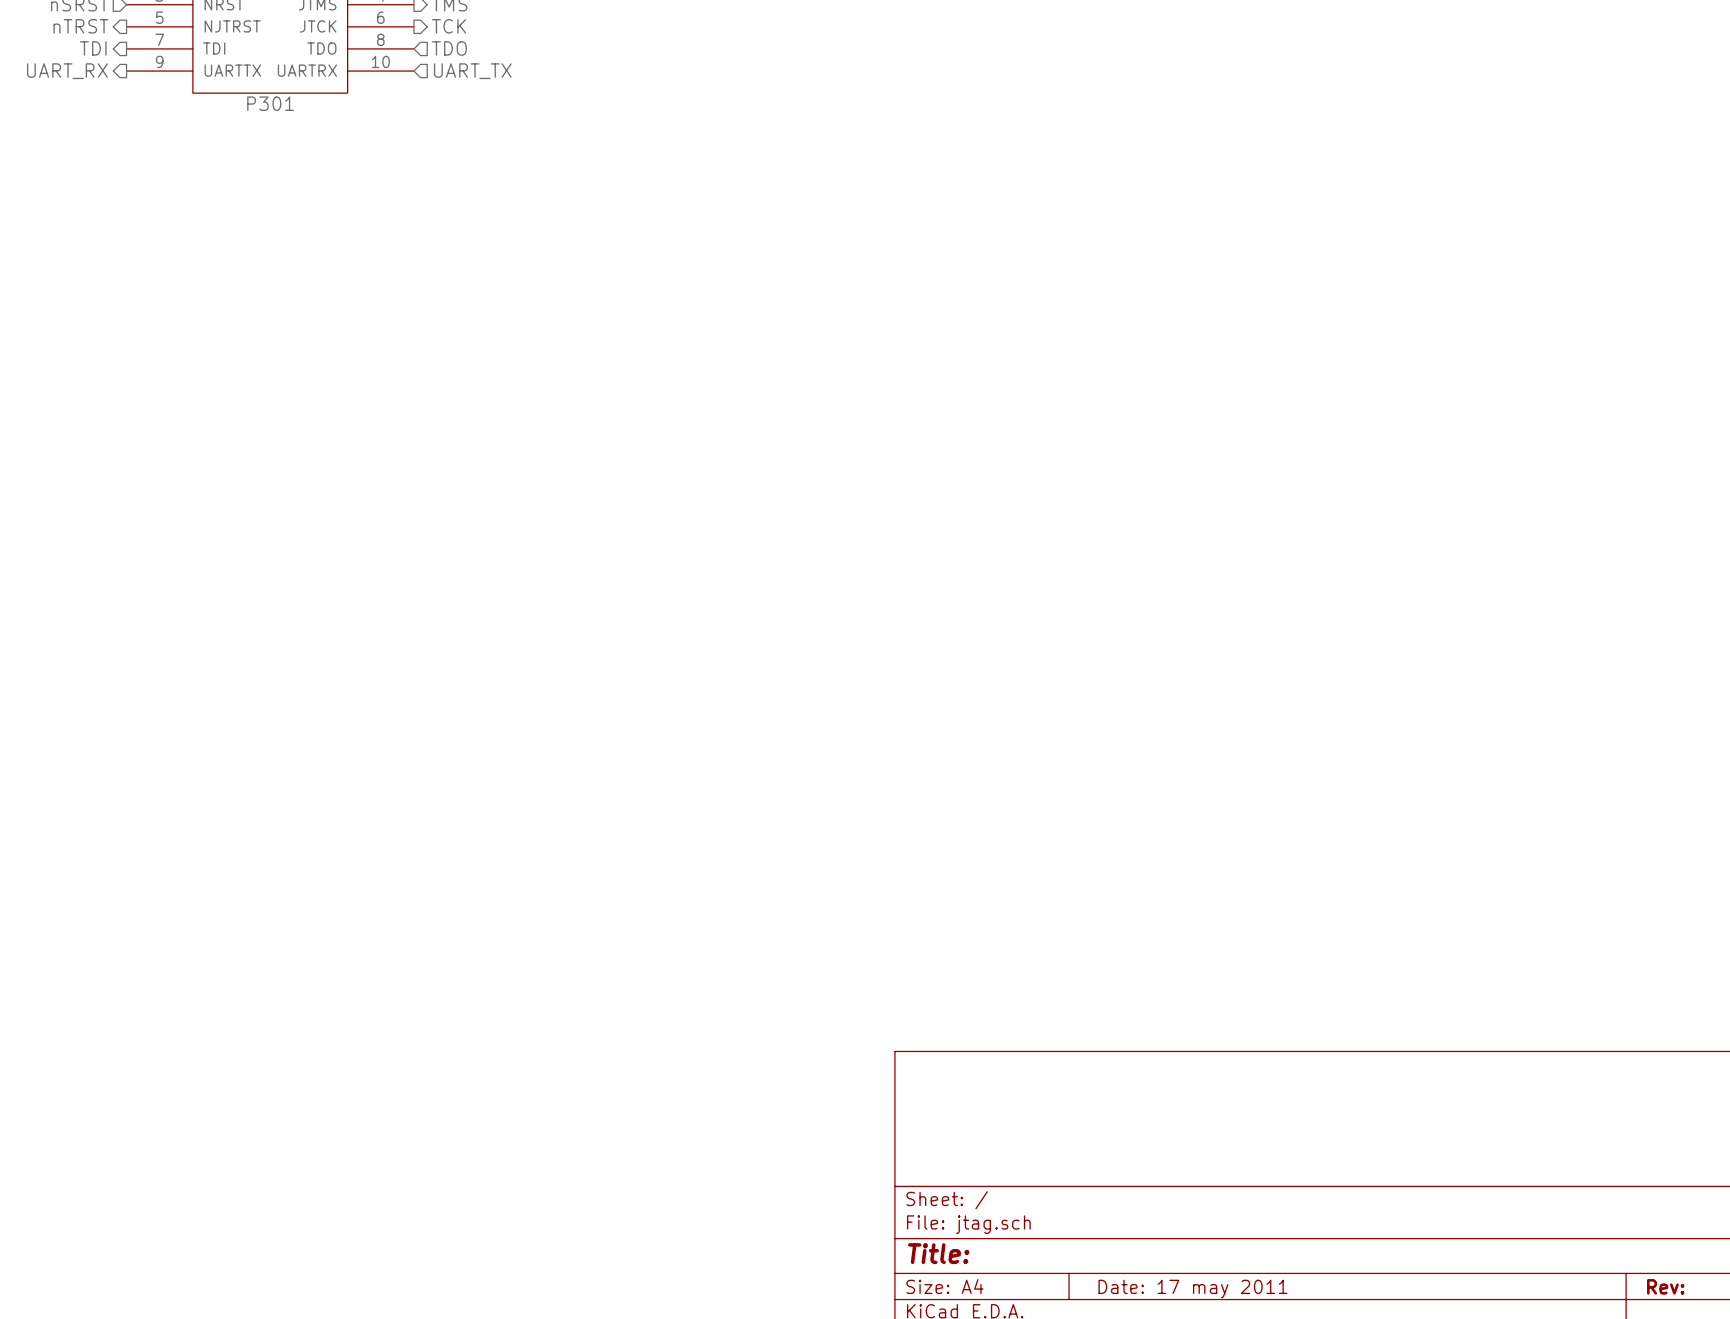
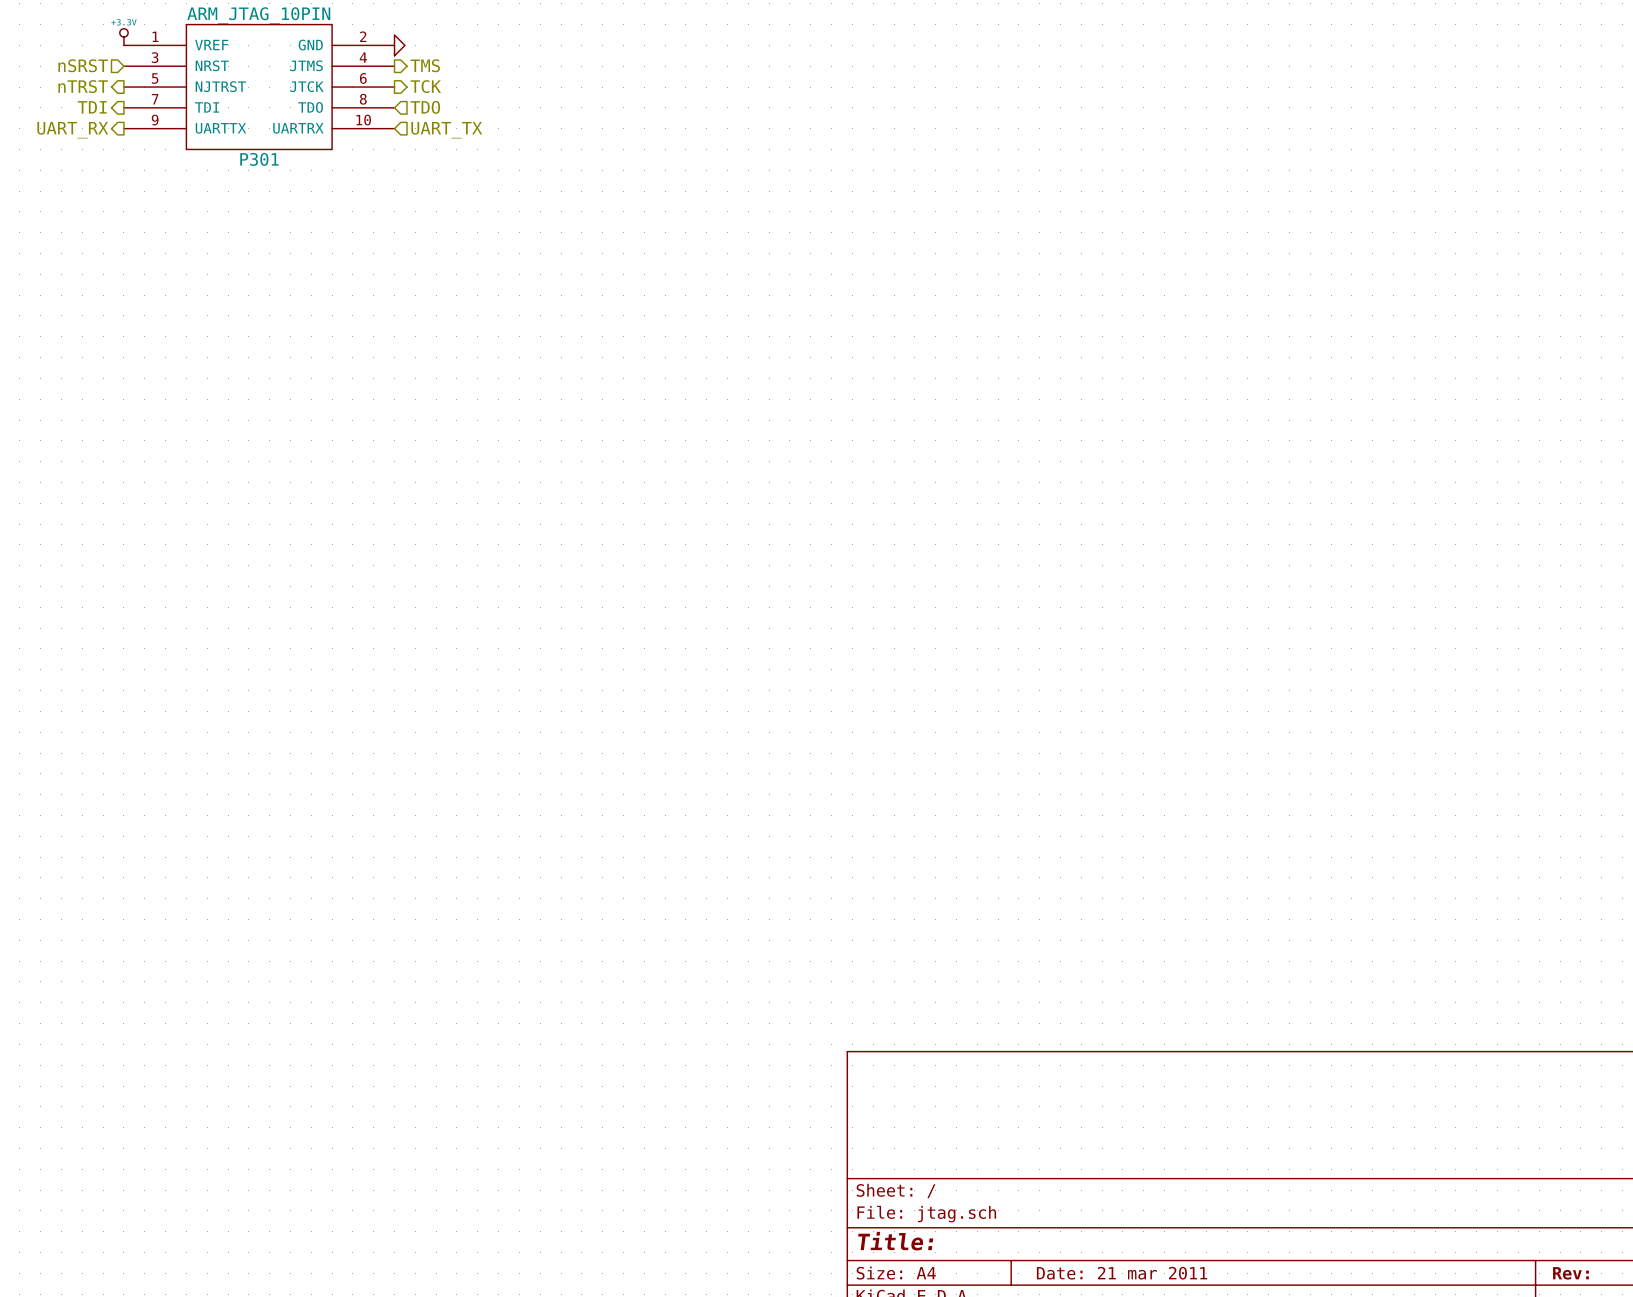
title block: Date: 17 may 2011 (1192, 1289) -> Date: 21 mar 2011 (1122, 1273)

